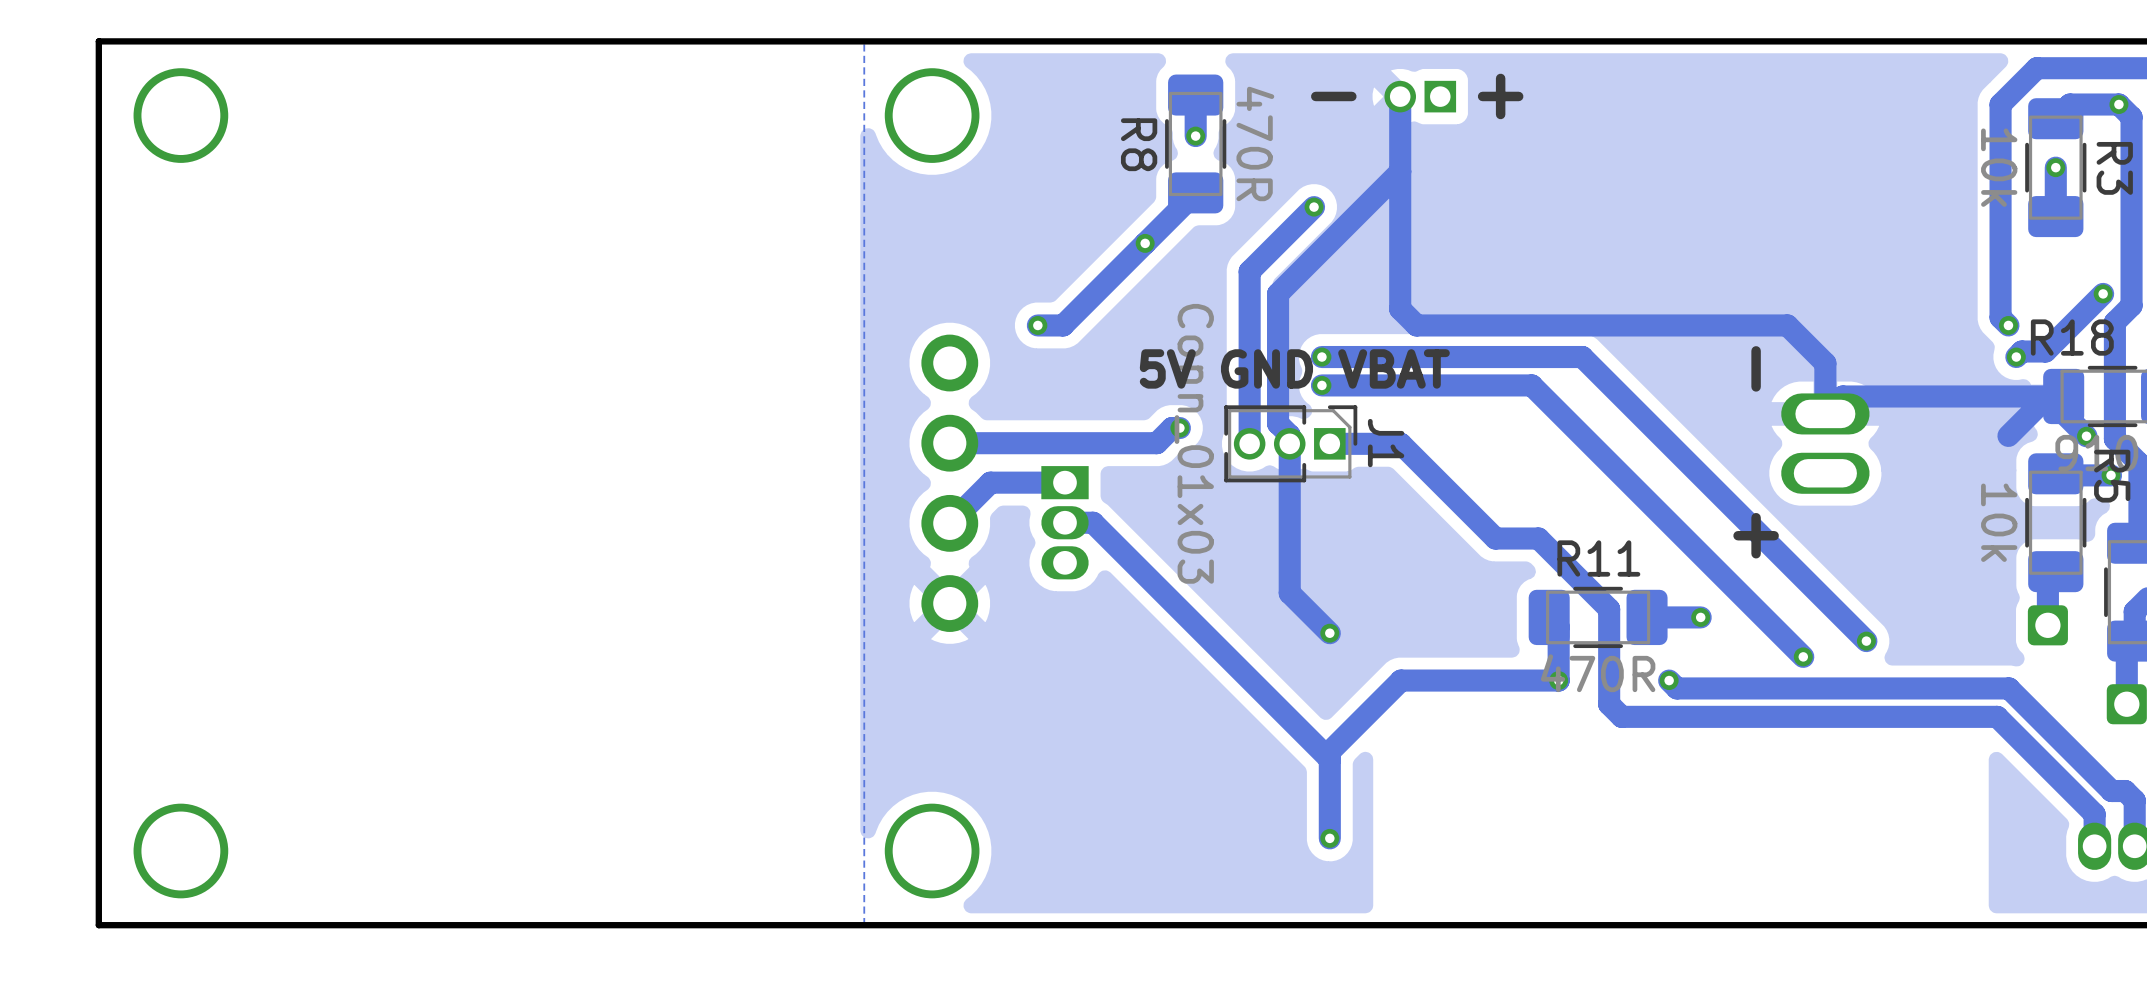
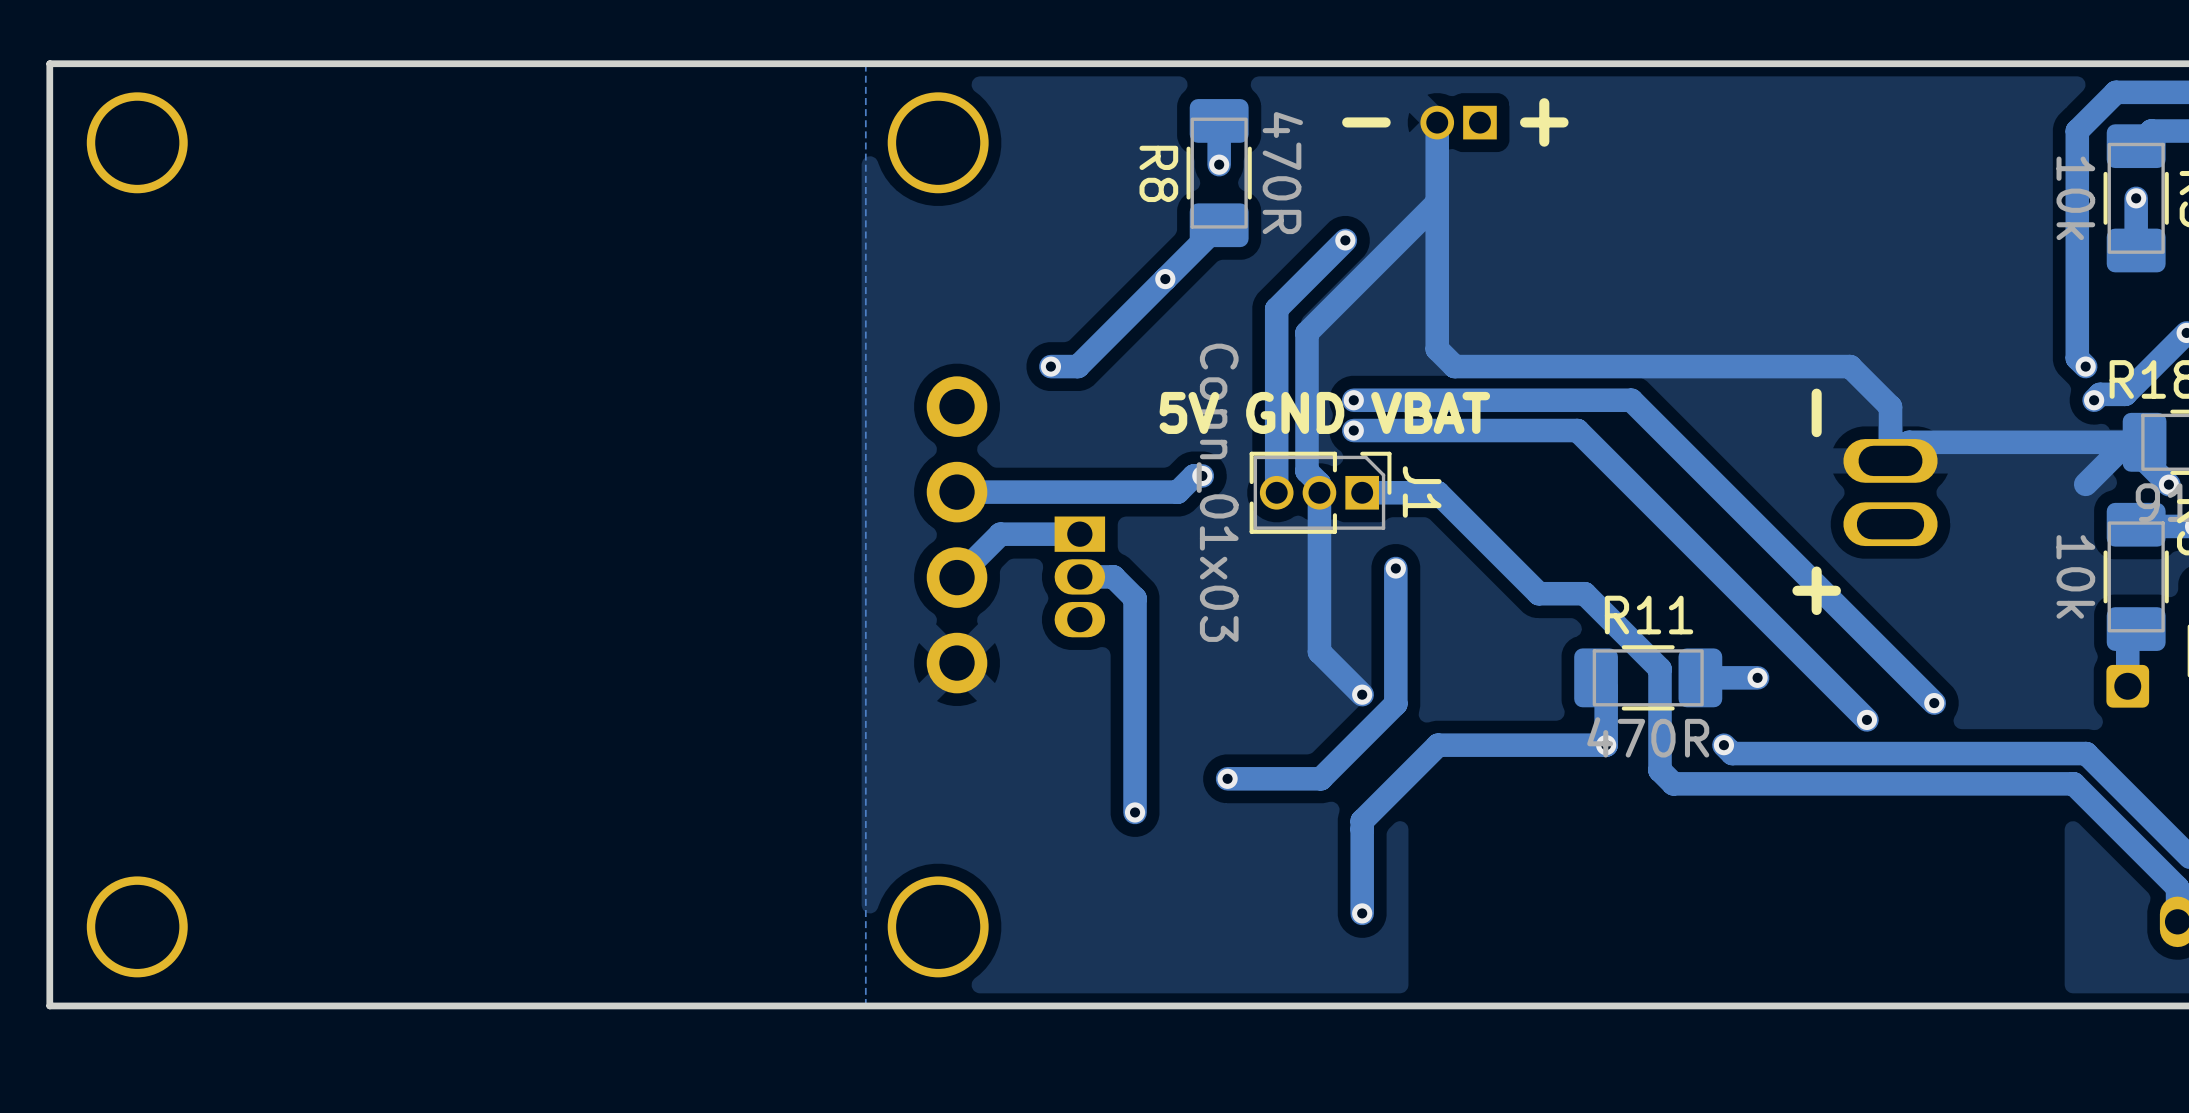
track: none -> (1395, 568) (1395, 703) (1320, 778) (1227, 778)
via: none -> (1395, 568)
track: (1093, 522) (1329, 759) -> (1109, 576) (1113, 576) (1135, 598) (1135, 812)
via: none -> (1227, 778)
via: none -> (1135, 812)

